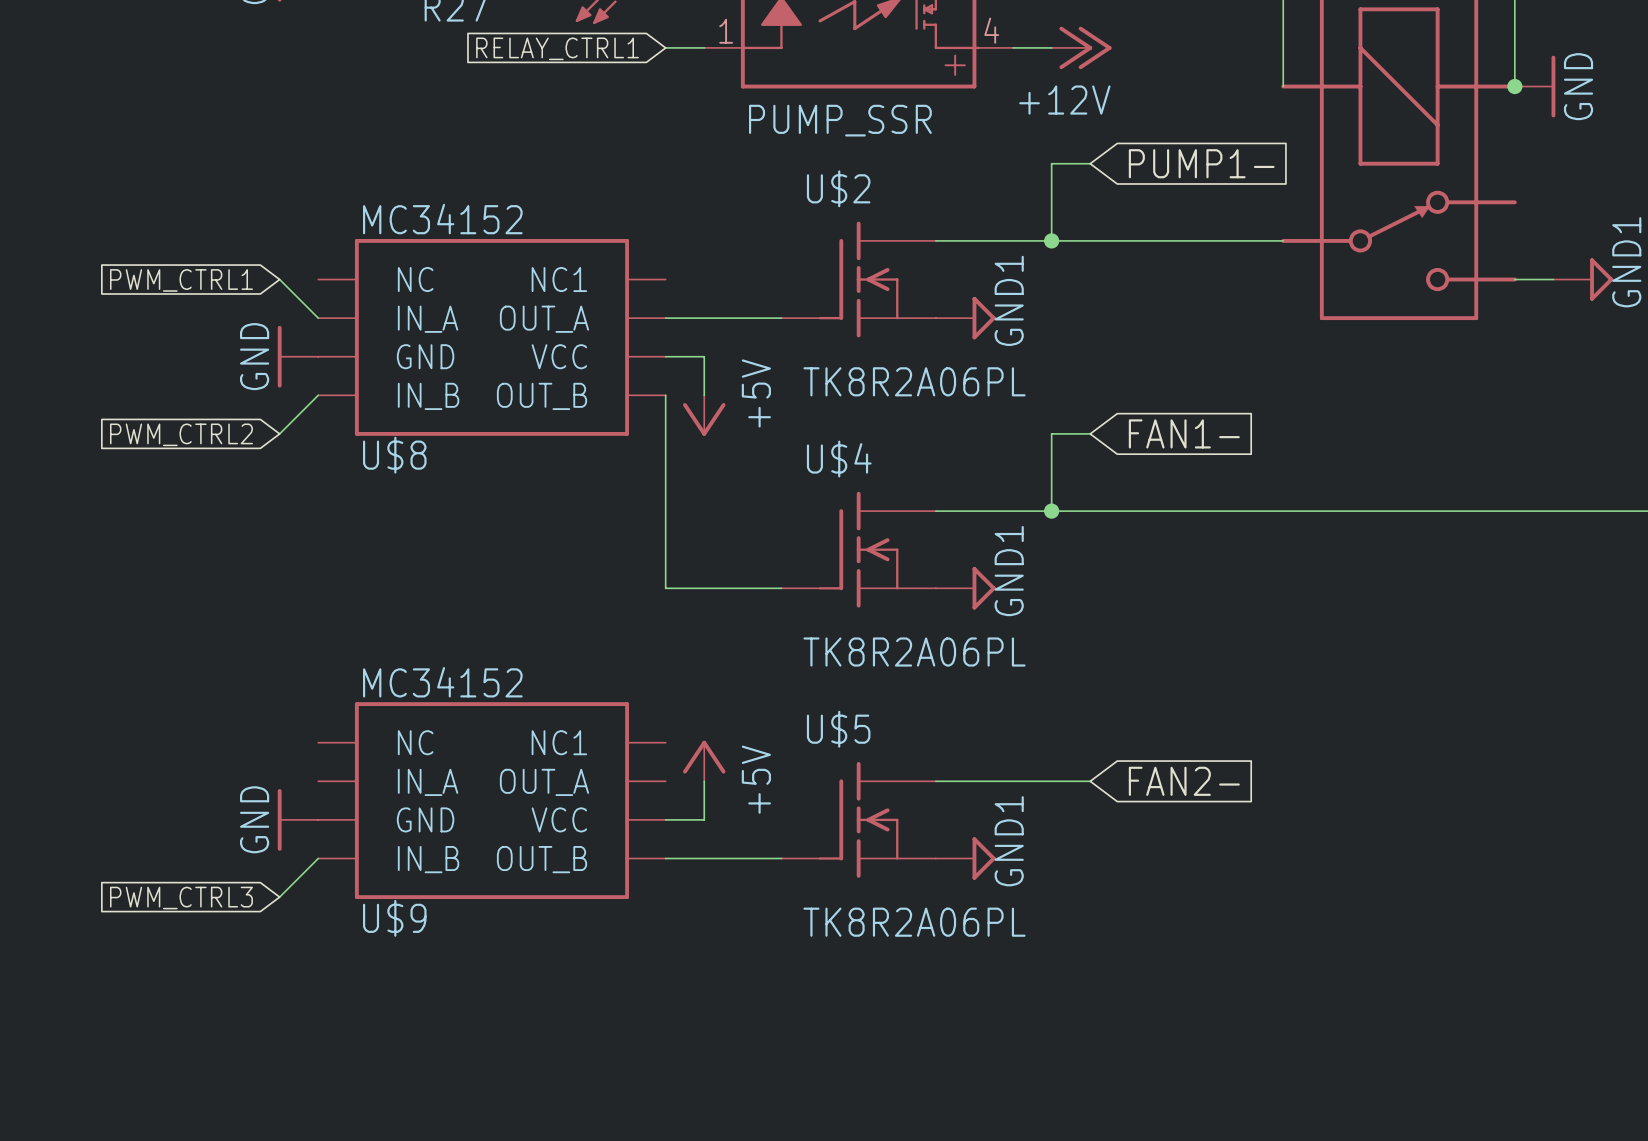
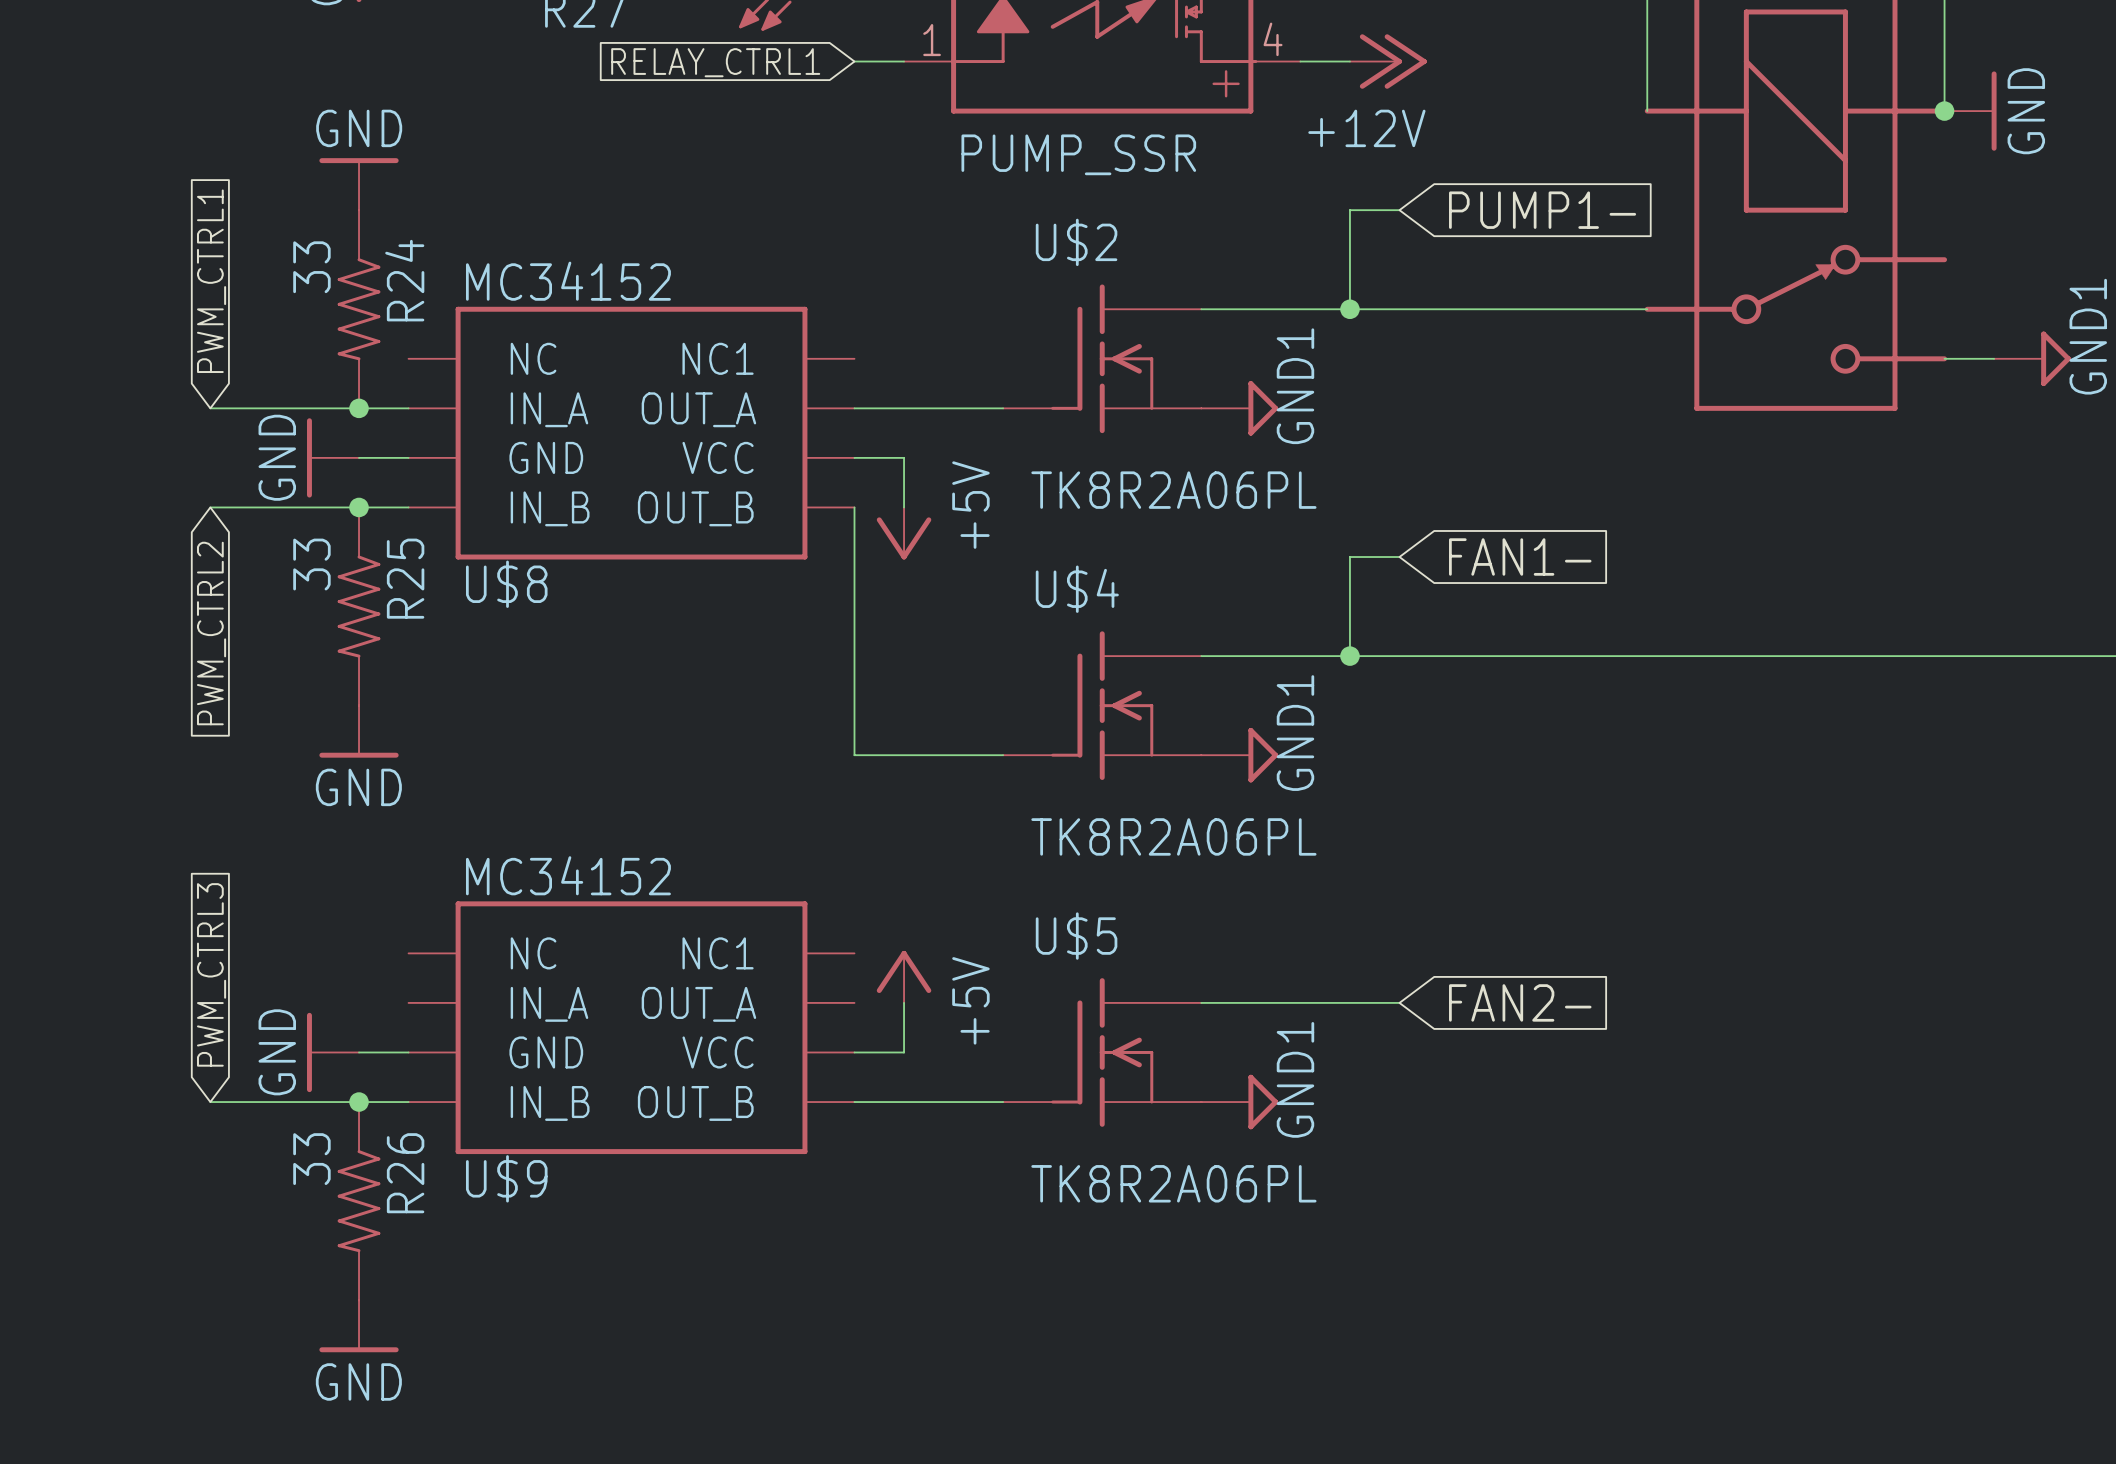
power symbol: none -> GND (359, 184)
R24: none -> 33 (359, 309)
wire: (279, 279) (318, 318) -> (210, 408) (408, 408)
global label rotation: 0° (181, 280) -> 90° clockwise (211, 281)
junction: none -> (359, 408)
power symbol position: GND (298, 356) -> GND (333, 457)
junction: none -> (359, 507)
wire: (318, 395) (279, 433) -> (408, 507) (210, 507)
global label rotation: 0° (181, 434) -> 90° counterclockwise (211, 633)
R25: none -> 33 (359, 606)
power symbol: none -> GND (359, 731)
power symbol position: GND (298, 819) -> GND (333, 1052)
junction: none -> (359, 1102)
wire: (318, 858) (279, 897) -> (408, 1102) (210, 1102)
global label rotation: 0° (181, 898) -> 90° clockwise (211, 974)
R26: none -> 33 (359, 1201)
power symbol: none -> GND (359, 1326)

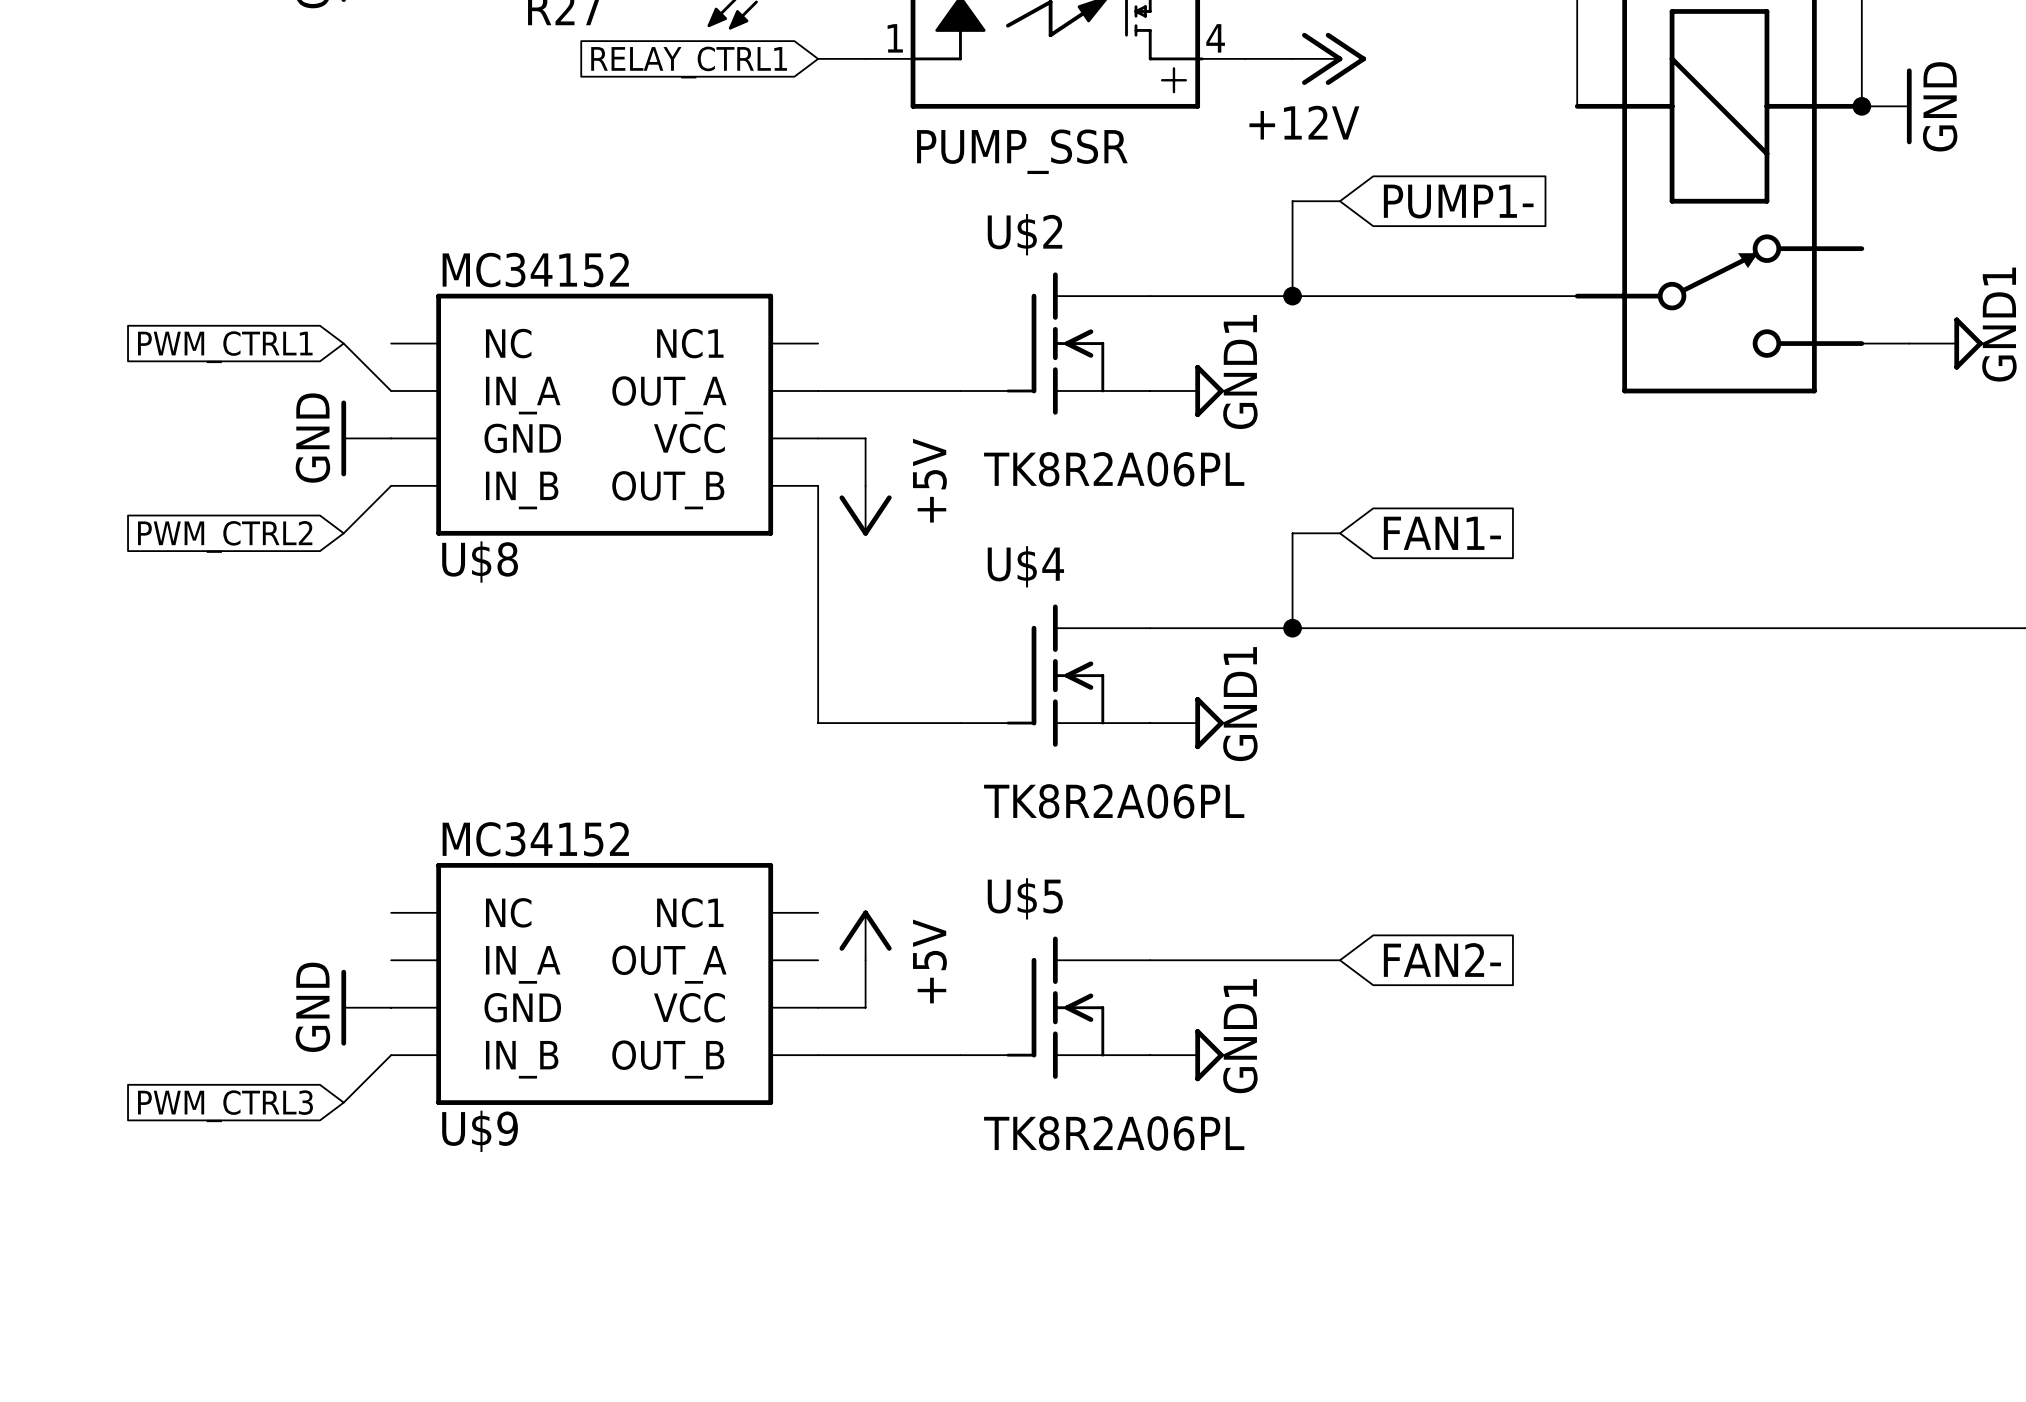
power symbol: GND (359, 184) -> none
global label rotation: 0° (211, 281) -> 90° counterclockwise (225, 347)
R24: 33 (359, 309) -> none
wire: (210, 408) (408, 408) -> (343, 343) (391, 390)
junction: (359, 408) -> none
power symbol position: GND (333, 457) -> GND (366, 438)
wire: (210, 507) (408, 507) -> (343, 533) (391, 485)
junction: (359, 507) -> none
R25: 33 (359, 606) -> none
global label rotation: 0° (211, 633) -> 90° clockwise (225, 536)
power symbol: GND (359, 731) -> none
global label rotation: 0° (211, 974) -> 90° counterclockwise (225, 1106)
power symbol position: GND (333, 1052) -> GND (366, 1007)
wire: (210, 1102) (408, 1102) -> (343, 1102) (391, 1055)
junction: (359, 1102) -> none
R26: 33 (359, 1201) -> none
power symbol: GND (359, 1326) -> none

